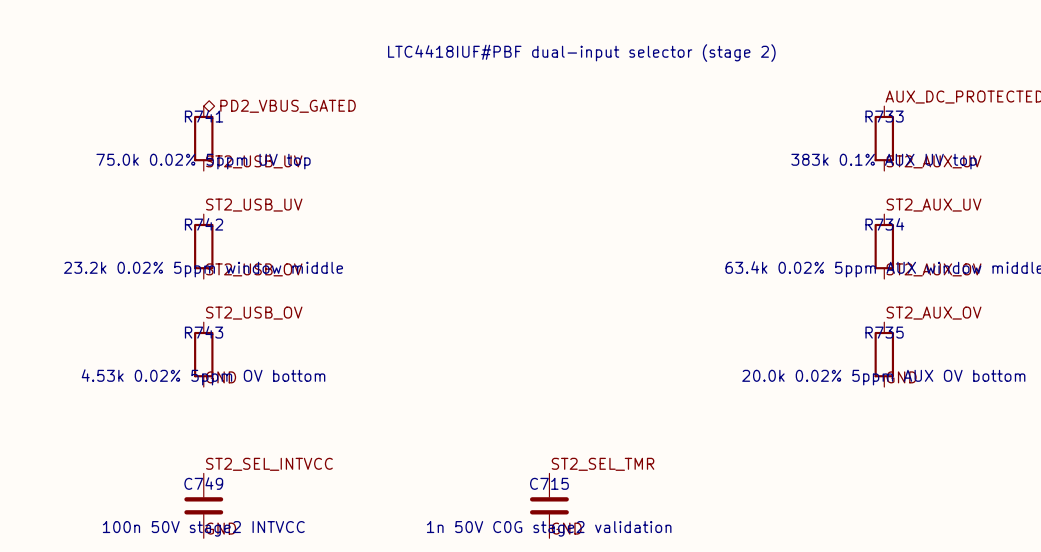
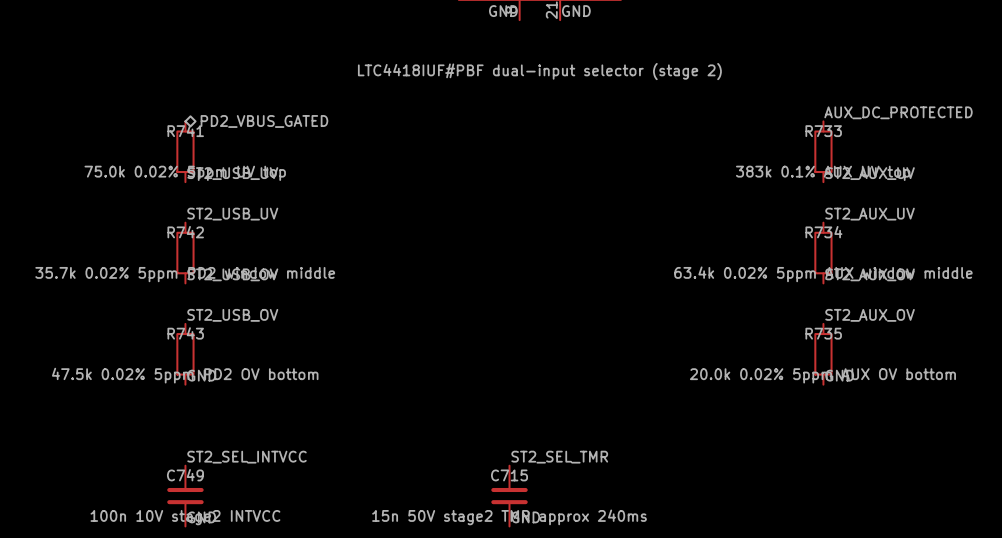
R742 value: 23.2k 0.02% 5ppm window middle (203, 269) -> 35.7k 0.02% 5ppm PD2 window middle (185, 274)
R743 value: 4.53k 0.02% 5ppm OV bottom (203, 377) -> 47.5k 0.02% 5ppm PD2 OV bottom (185, 375)
C749 value: 100n 50V stage2 INTVCC (203, 528) -> 100n 10V stage2 INTVCC (185, 517)
C715 value: 1n 50V C0G stage2 validation (549, 528) -> 15n 50V stage2 TMR approx 240ms (509, 517)

